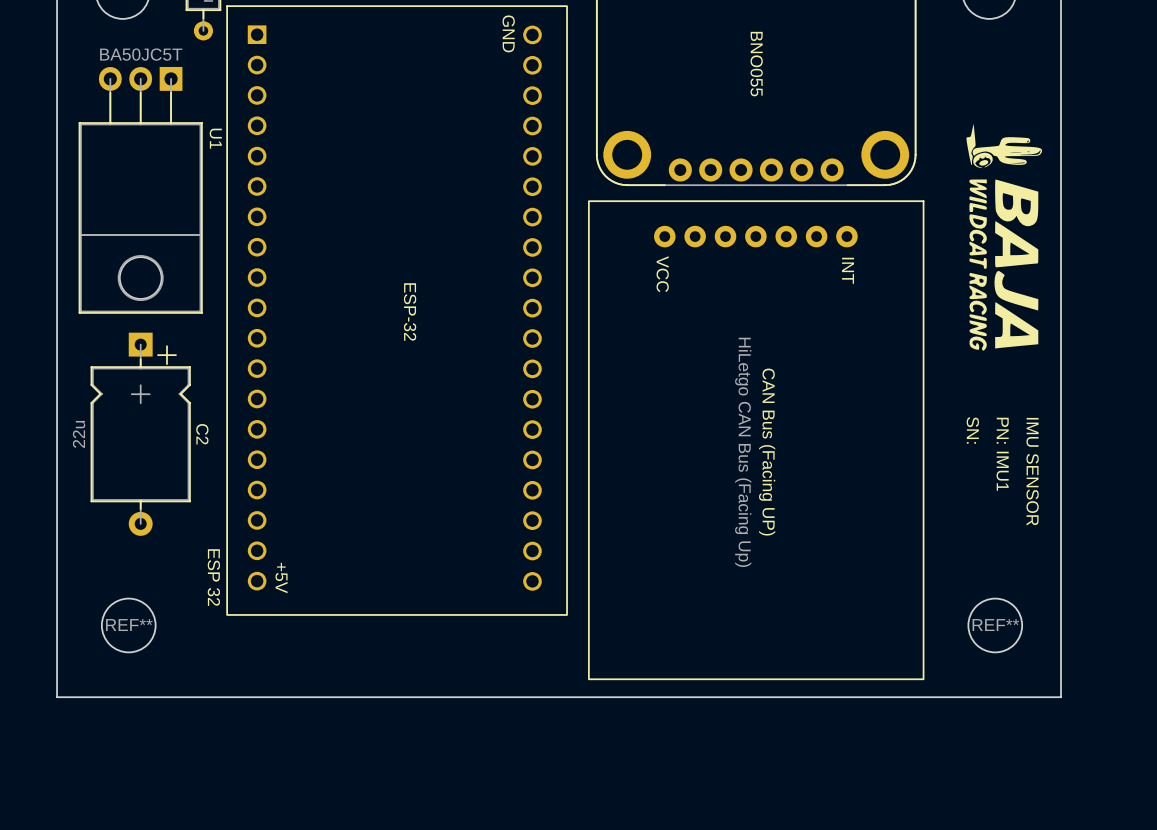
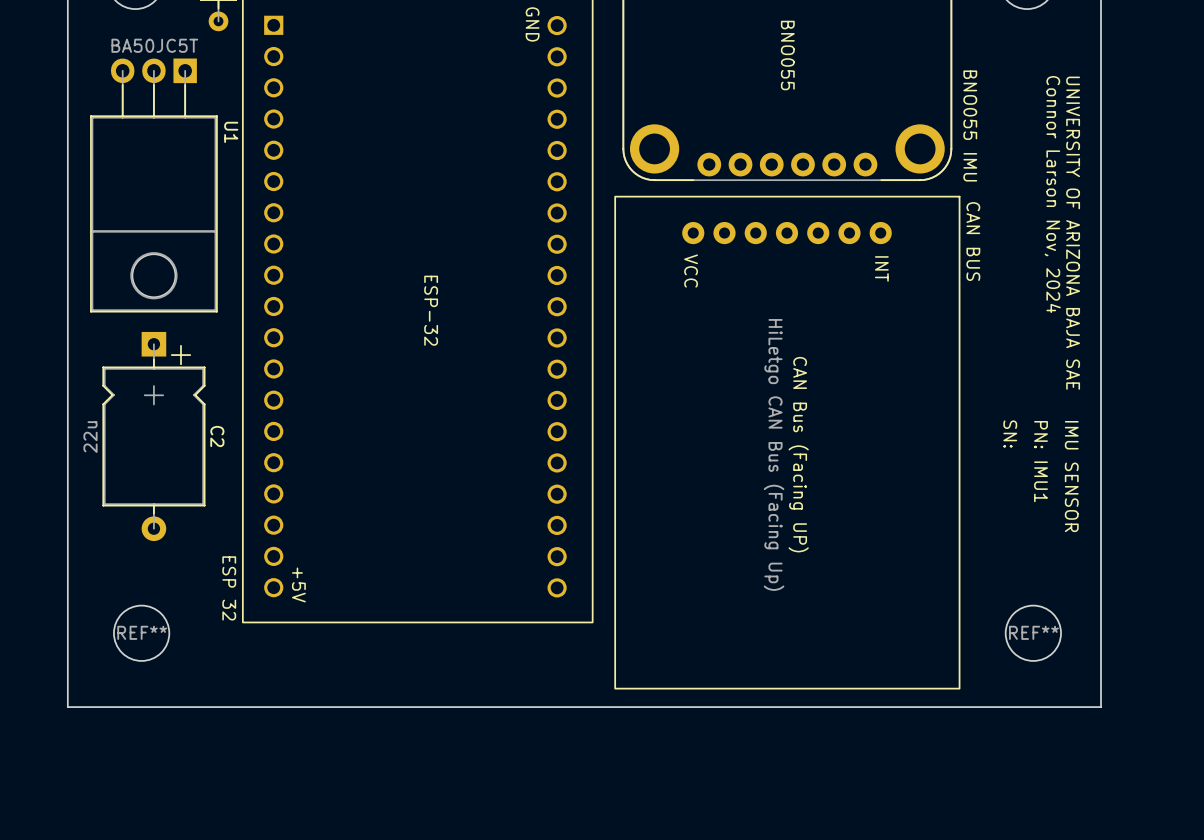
drawing: [966, 123, 1043, 351] -> none
text: none -> BNO055 IMU (970, 126)
text: none -> Connor Larson Nov, 2024 (1052, 194)
text: none -> UNIVERSITY OF ARIZONA BAJA SAE (1073, 233)
text: none -> CAN BUS (973, 241)

